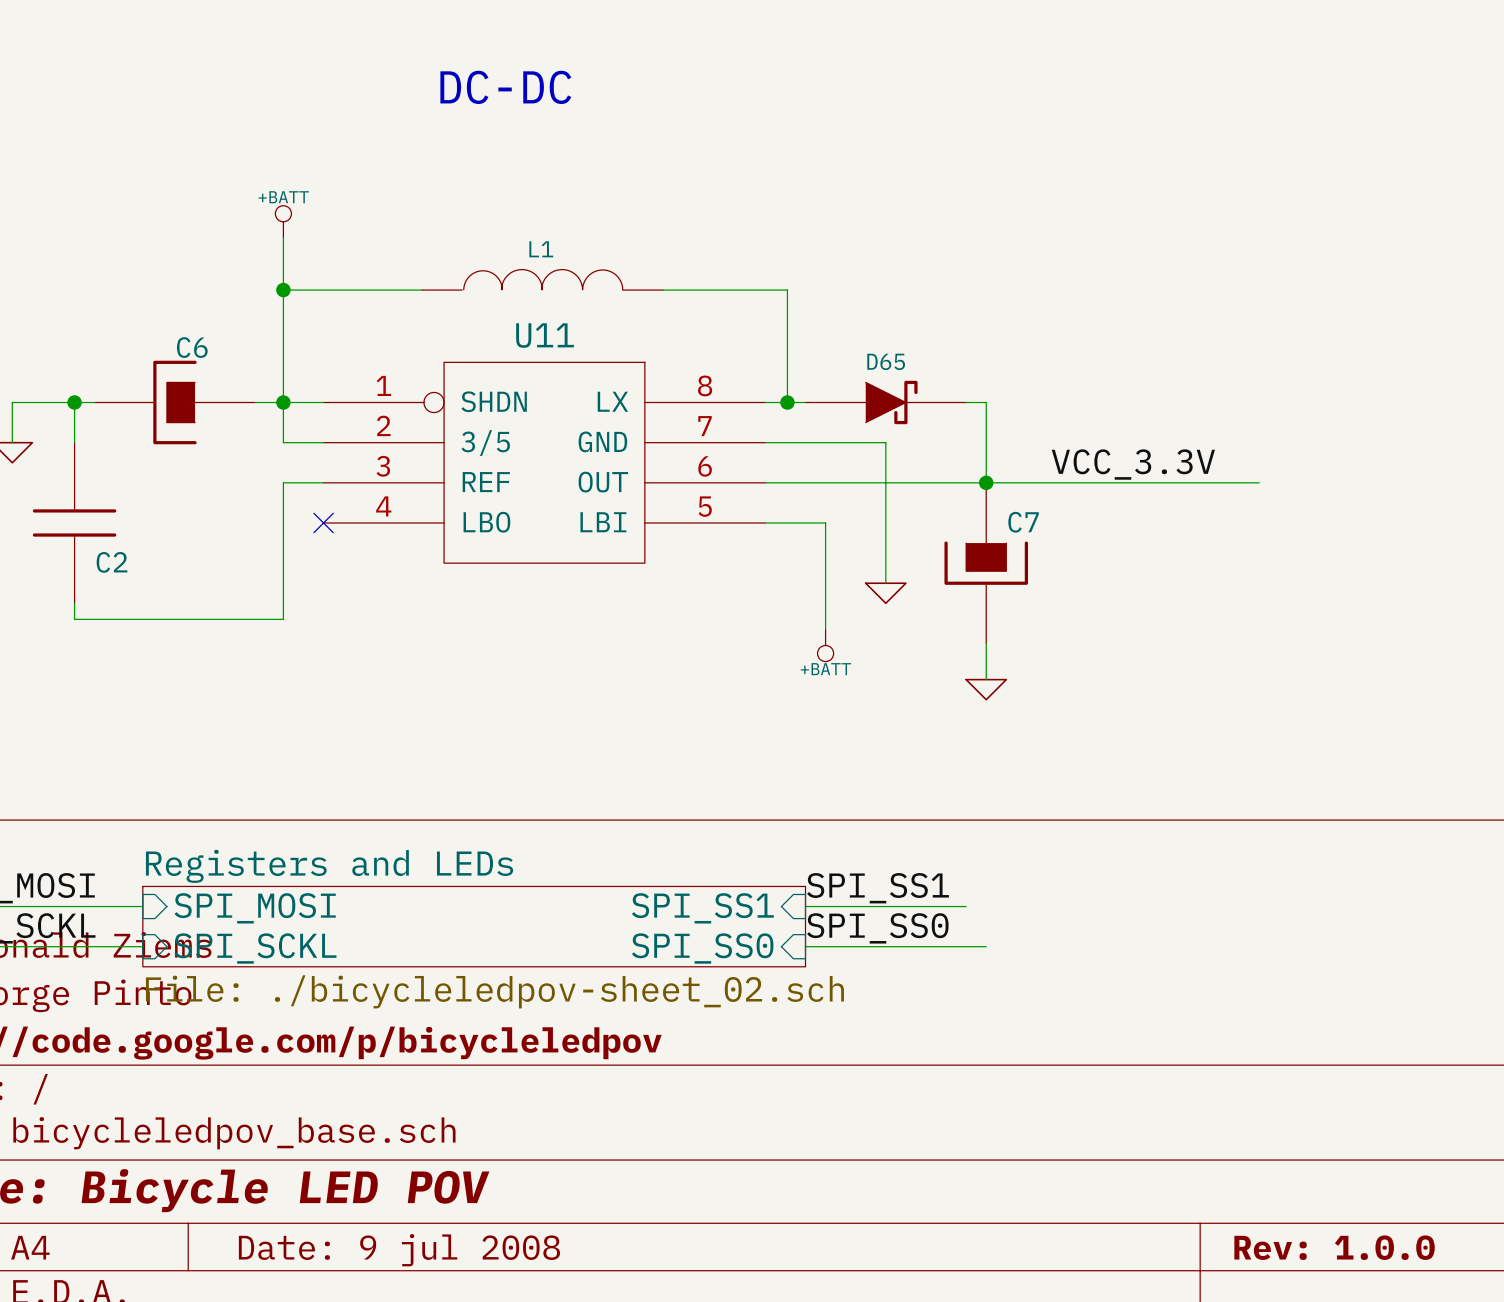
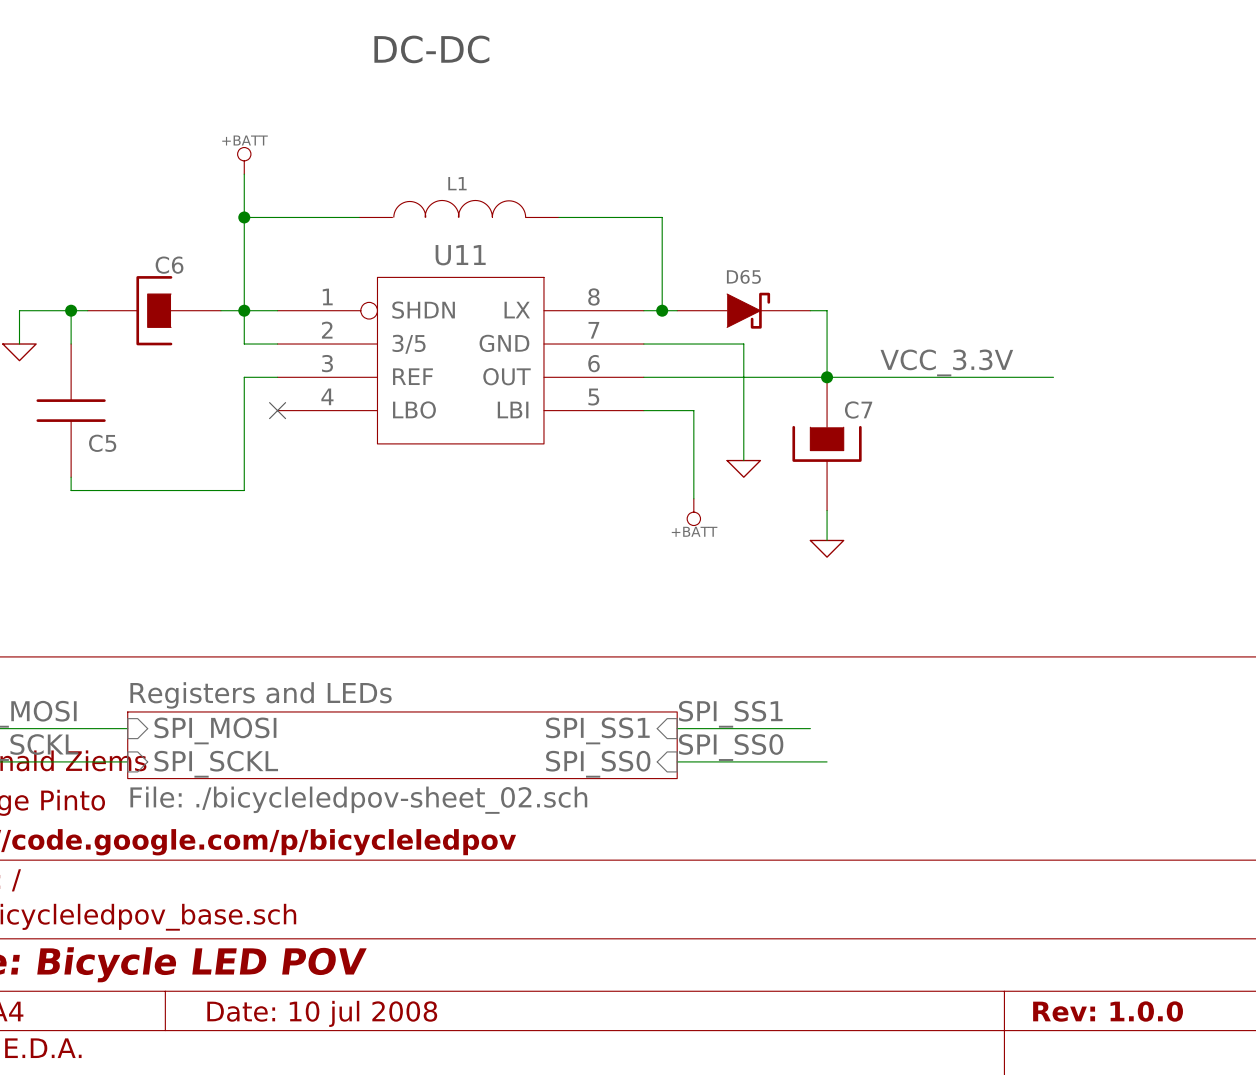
C2 name: C2 (112, 562) -> C5 (102, 443)
title block: Date: 9 jul 2008 (399, 1250) -> Date: 10 jul 2008 (322, 1013)

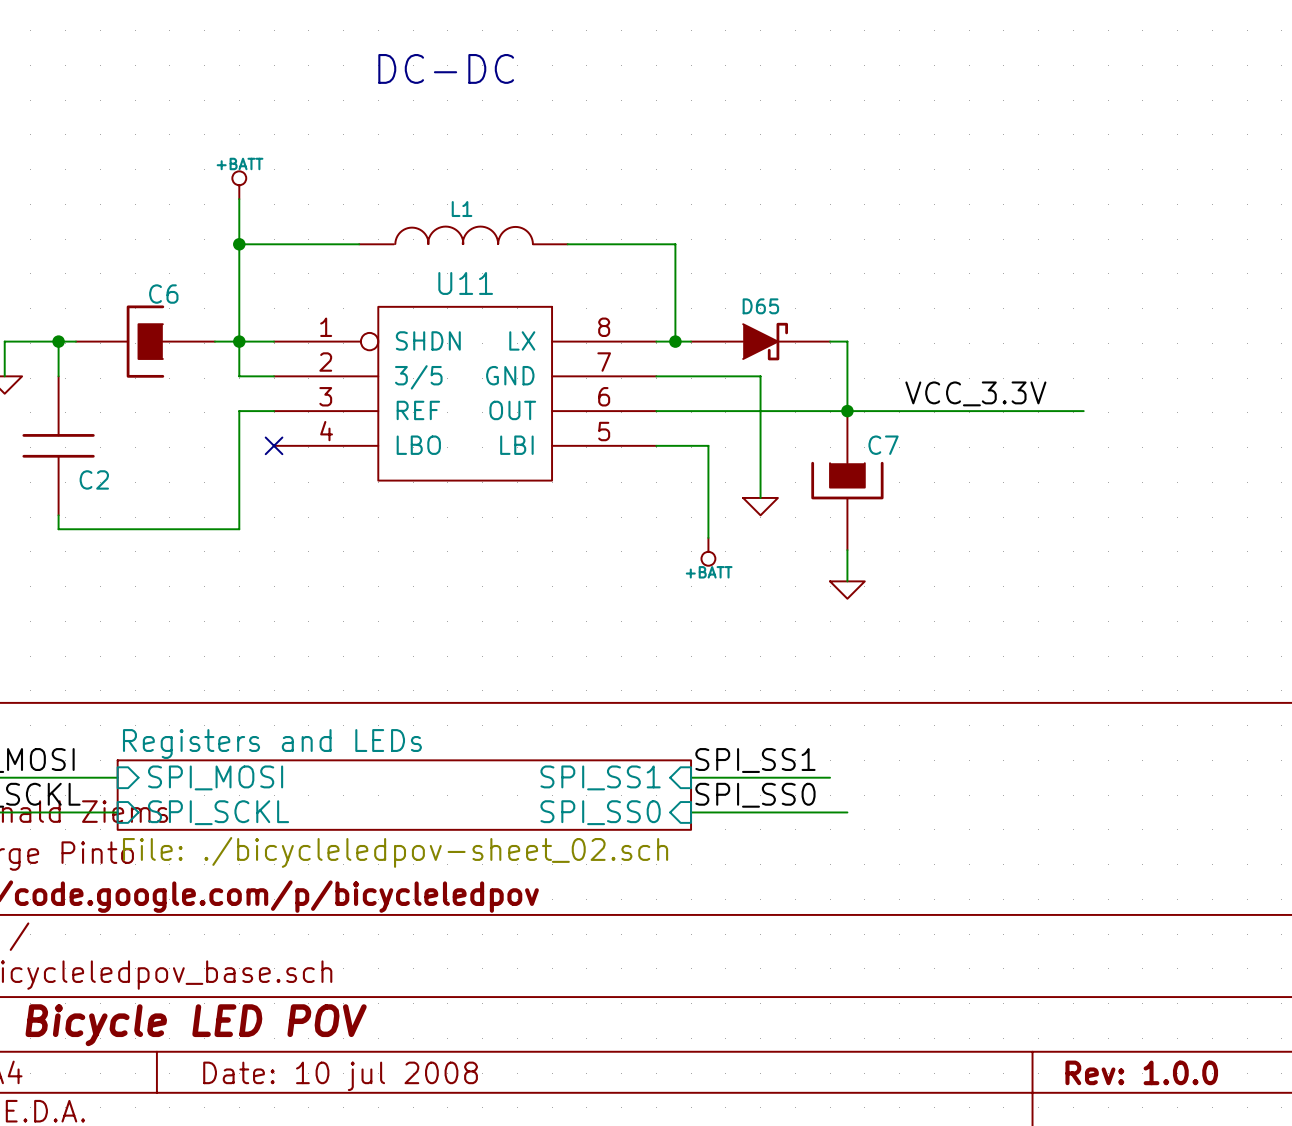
C5 name: C5 (102, 443) -> C2 (94, 479)

